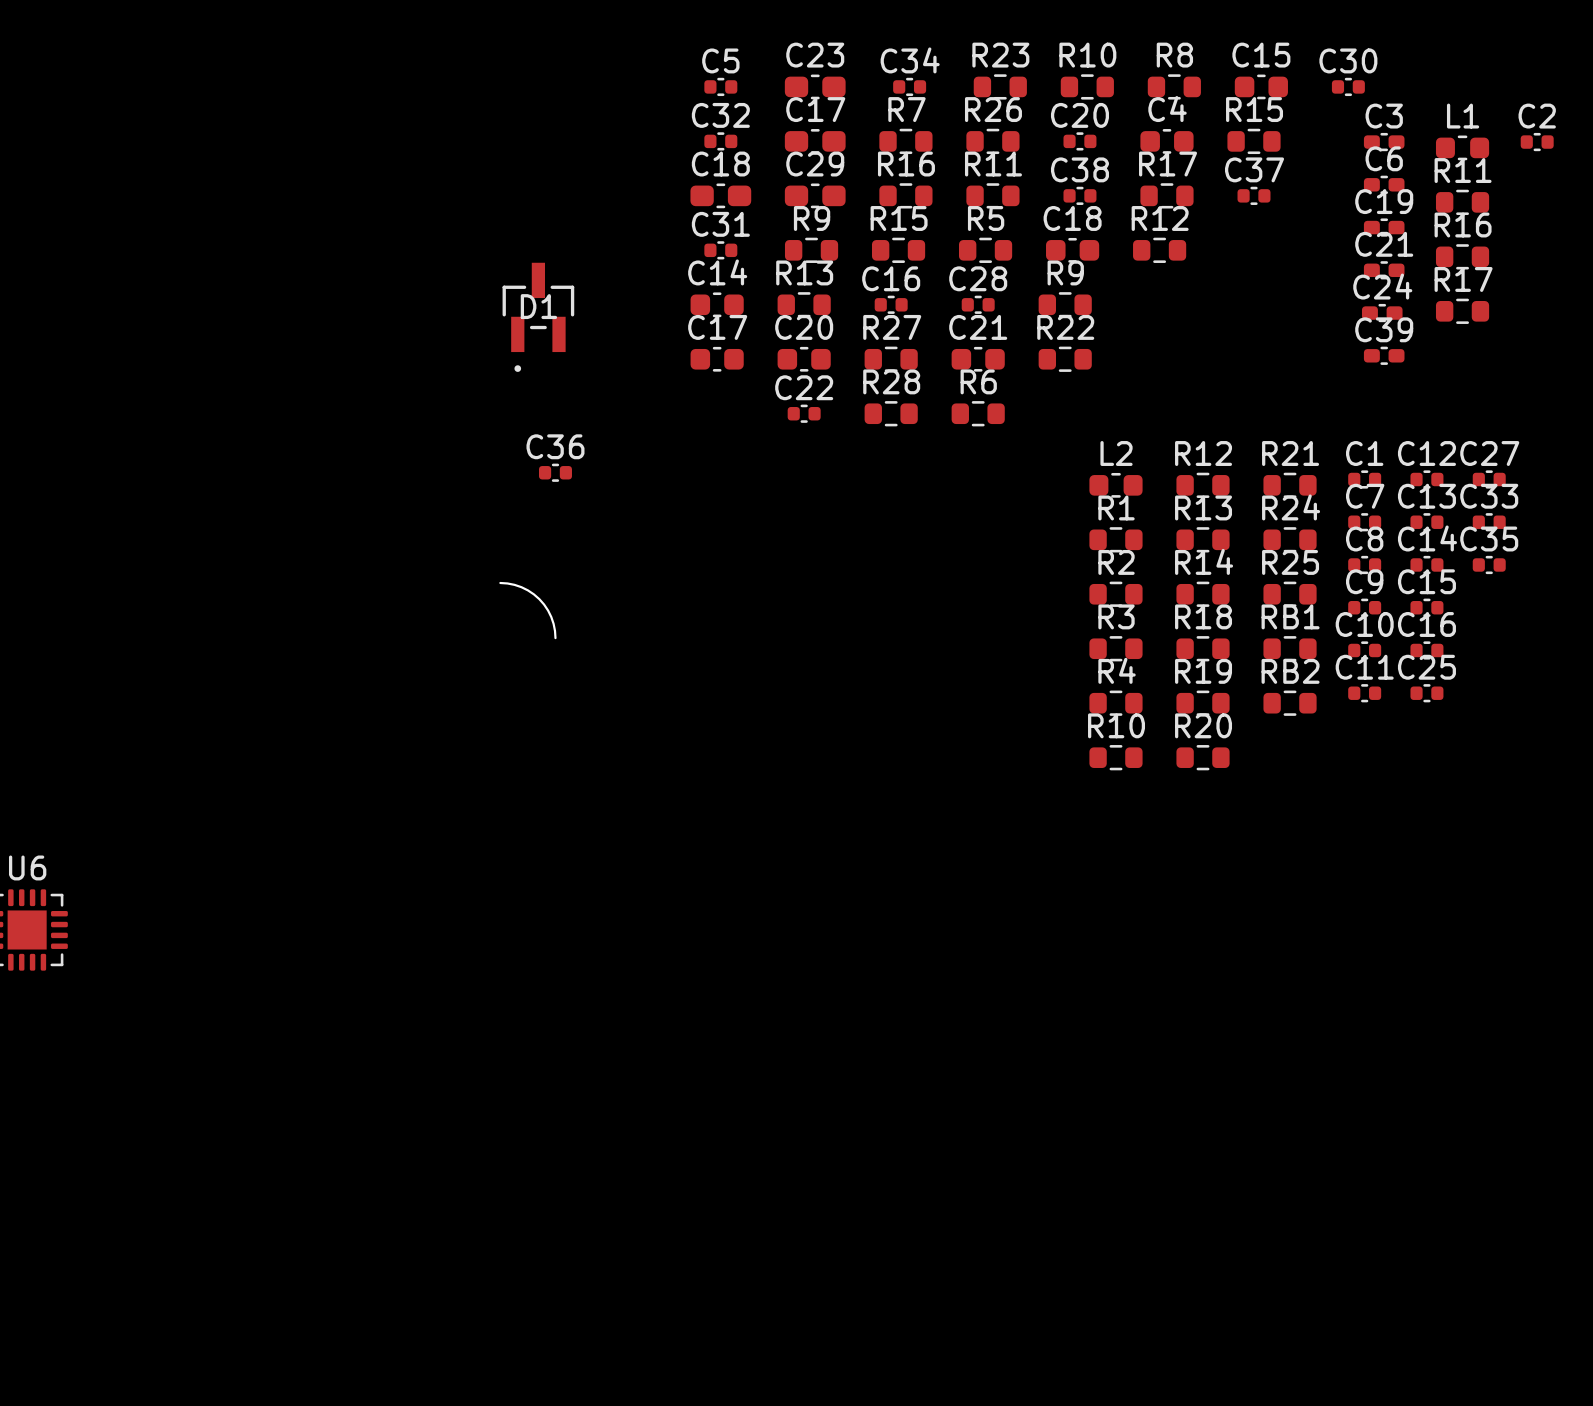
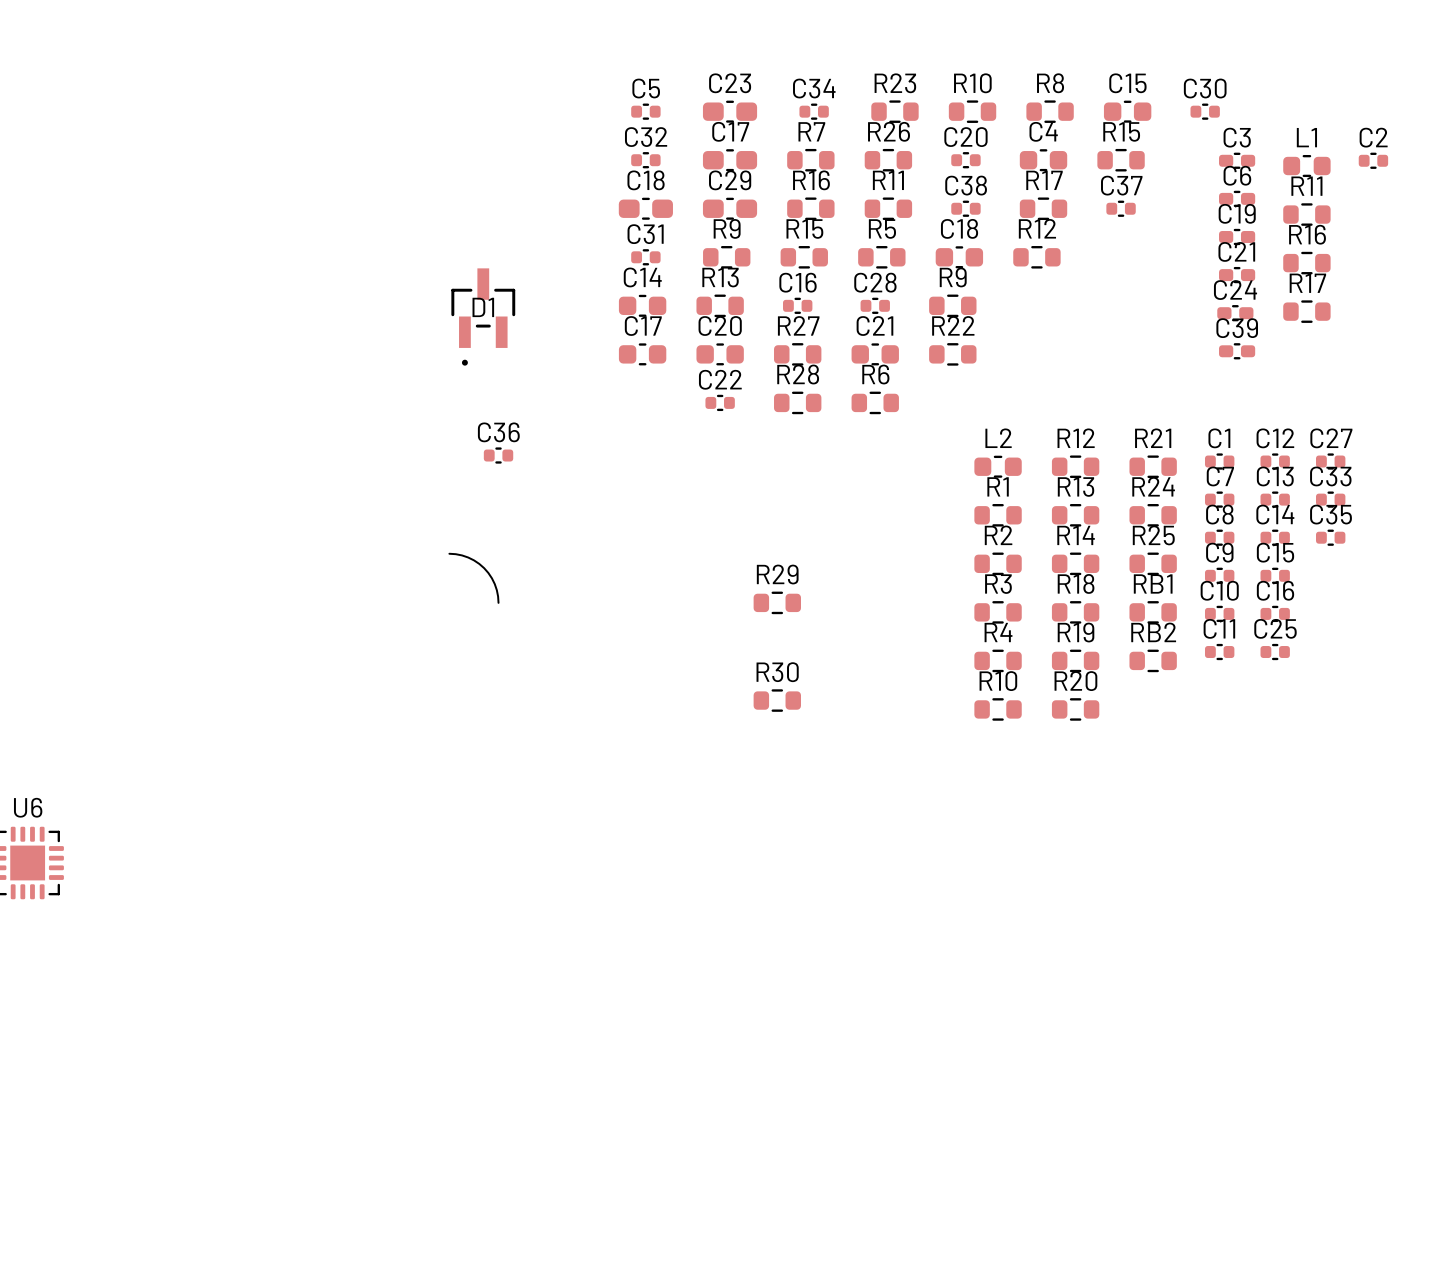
R29: none -> (777, 602)
R30: none -> (777, 700)

